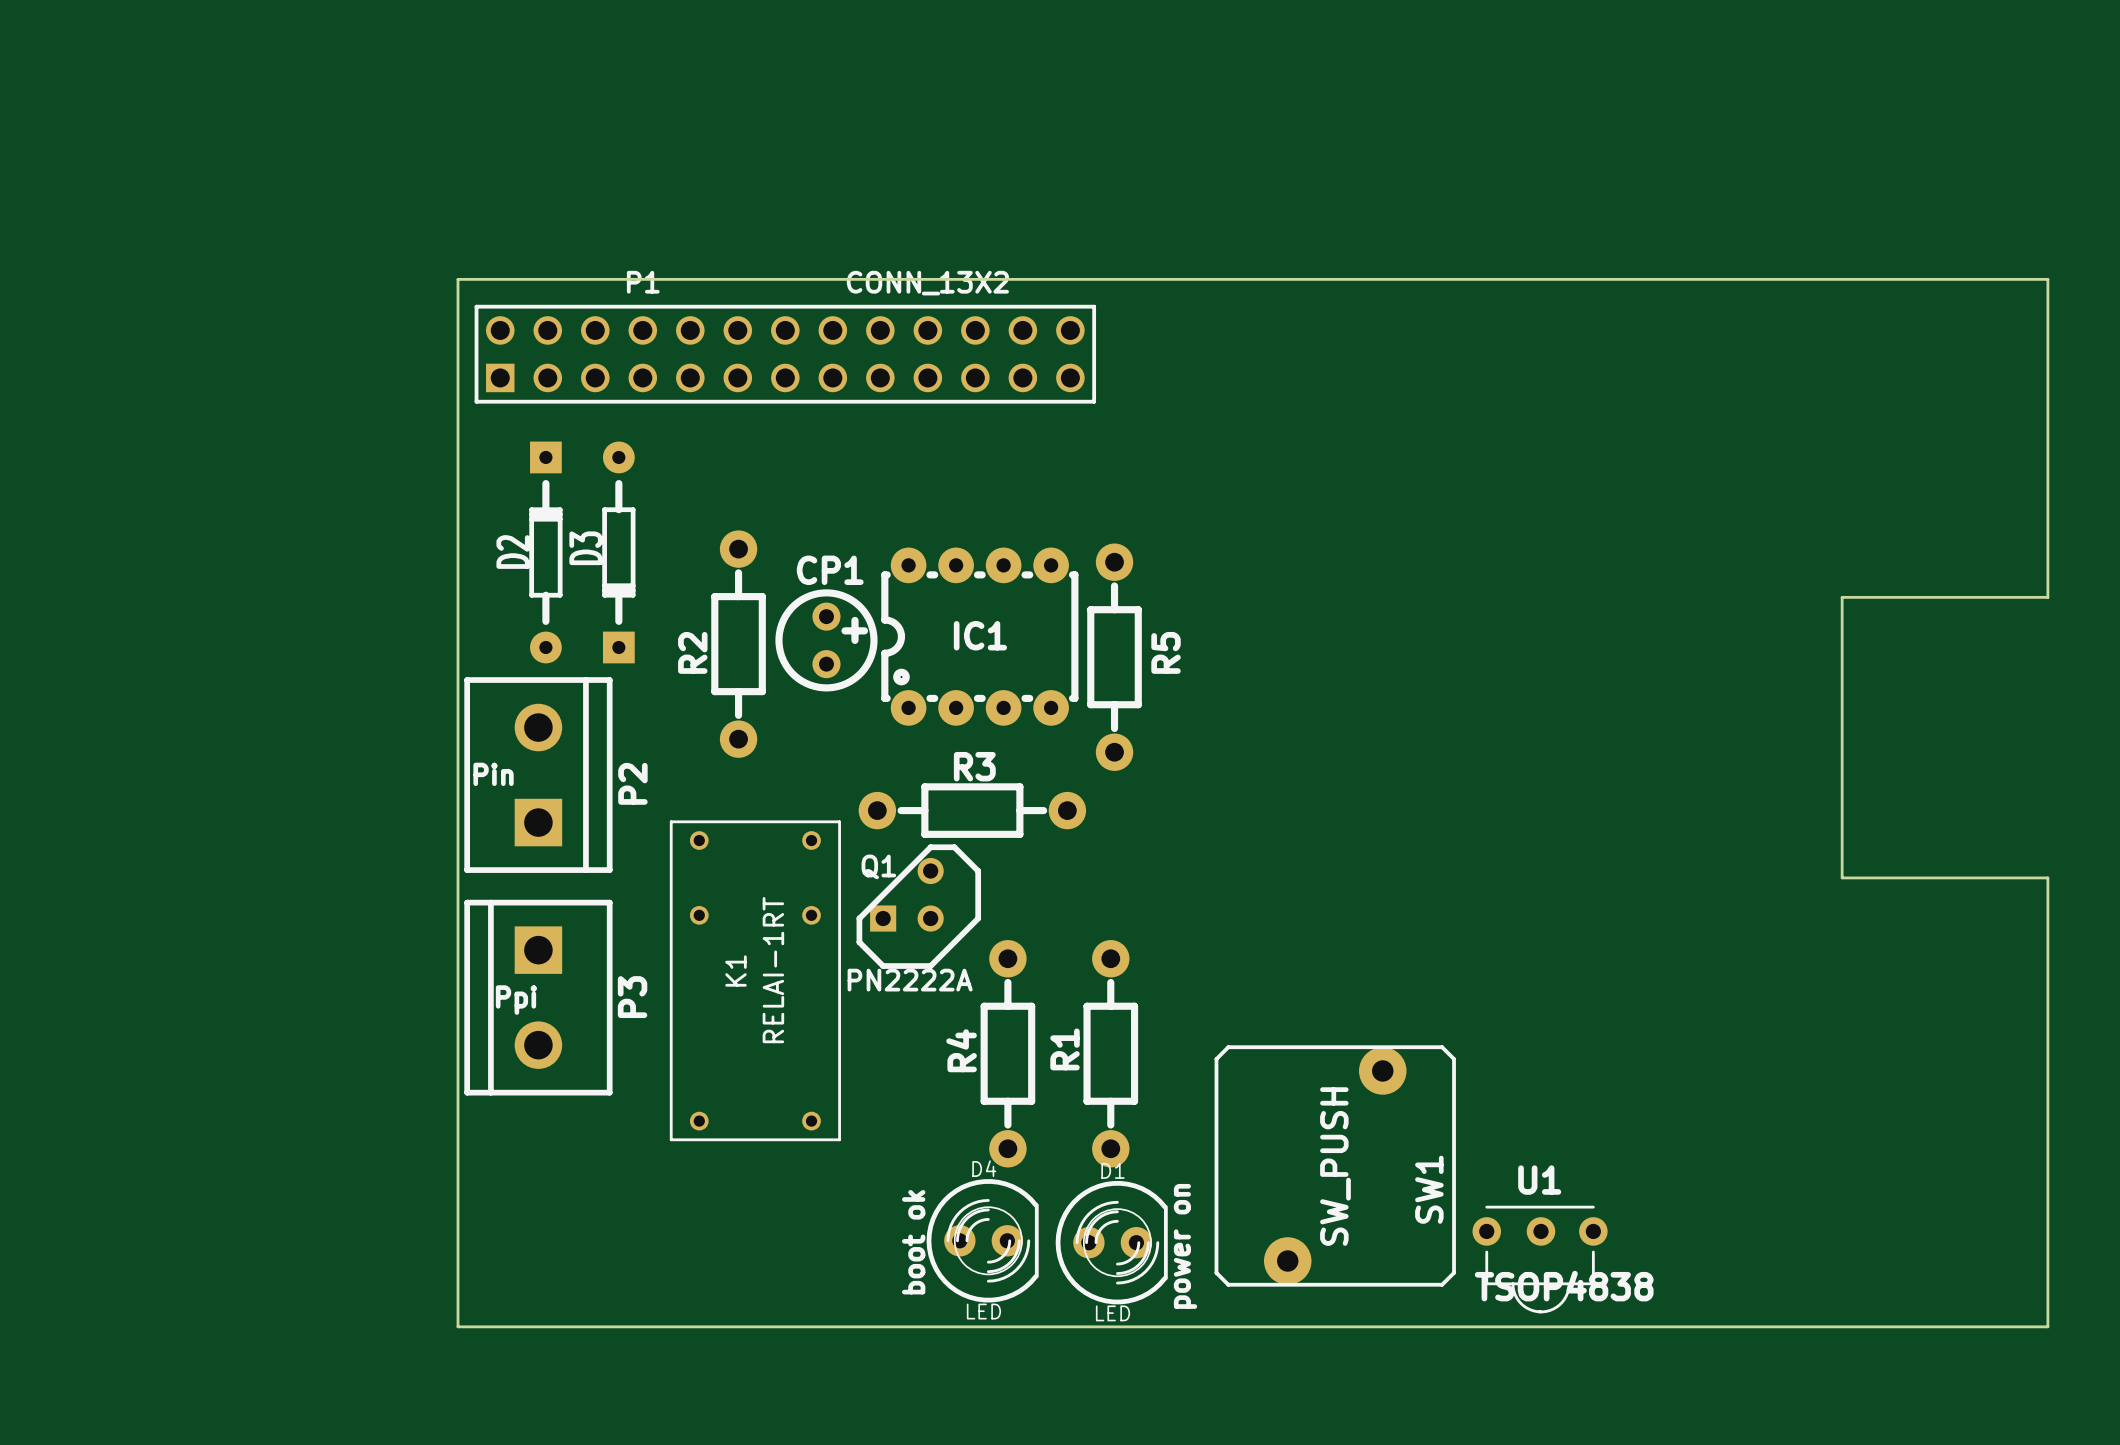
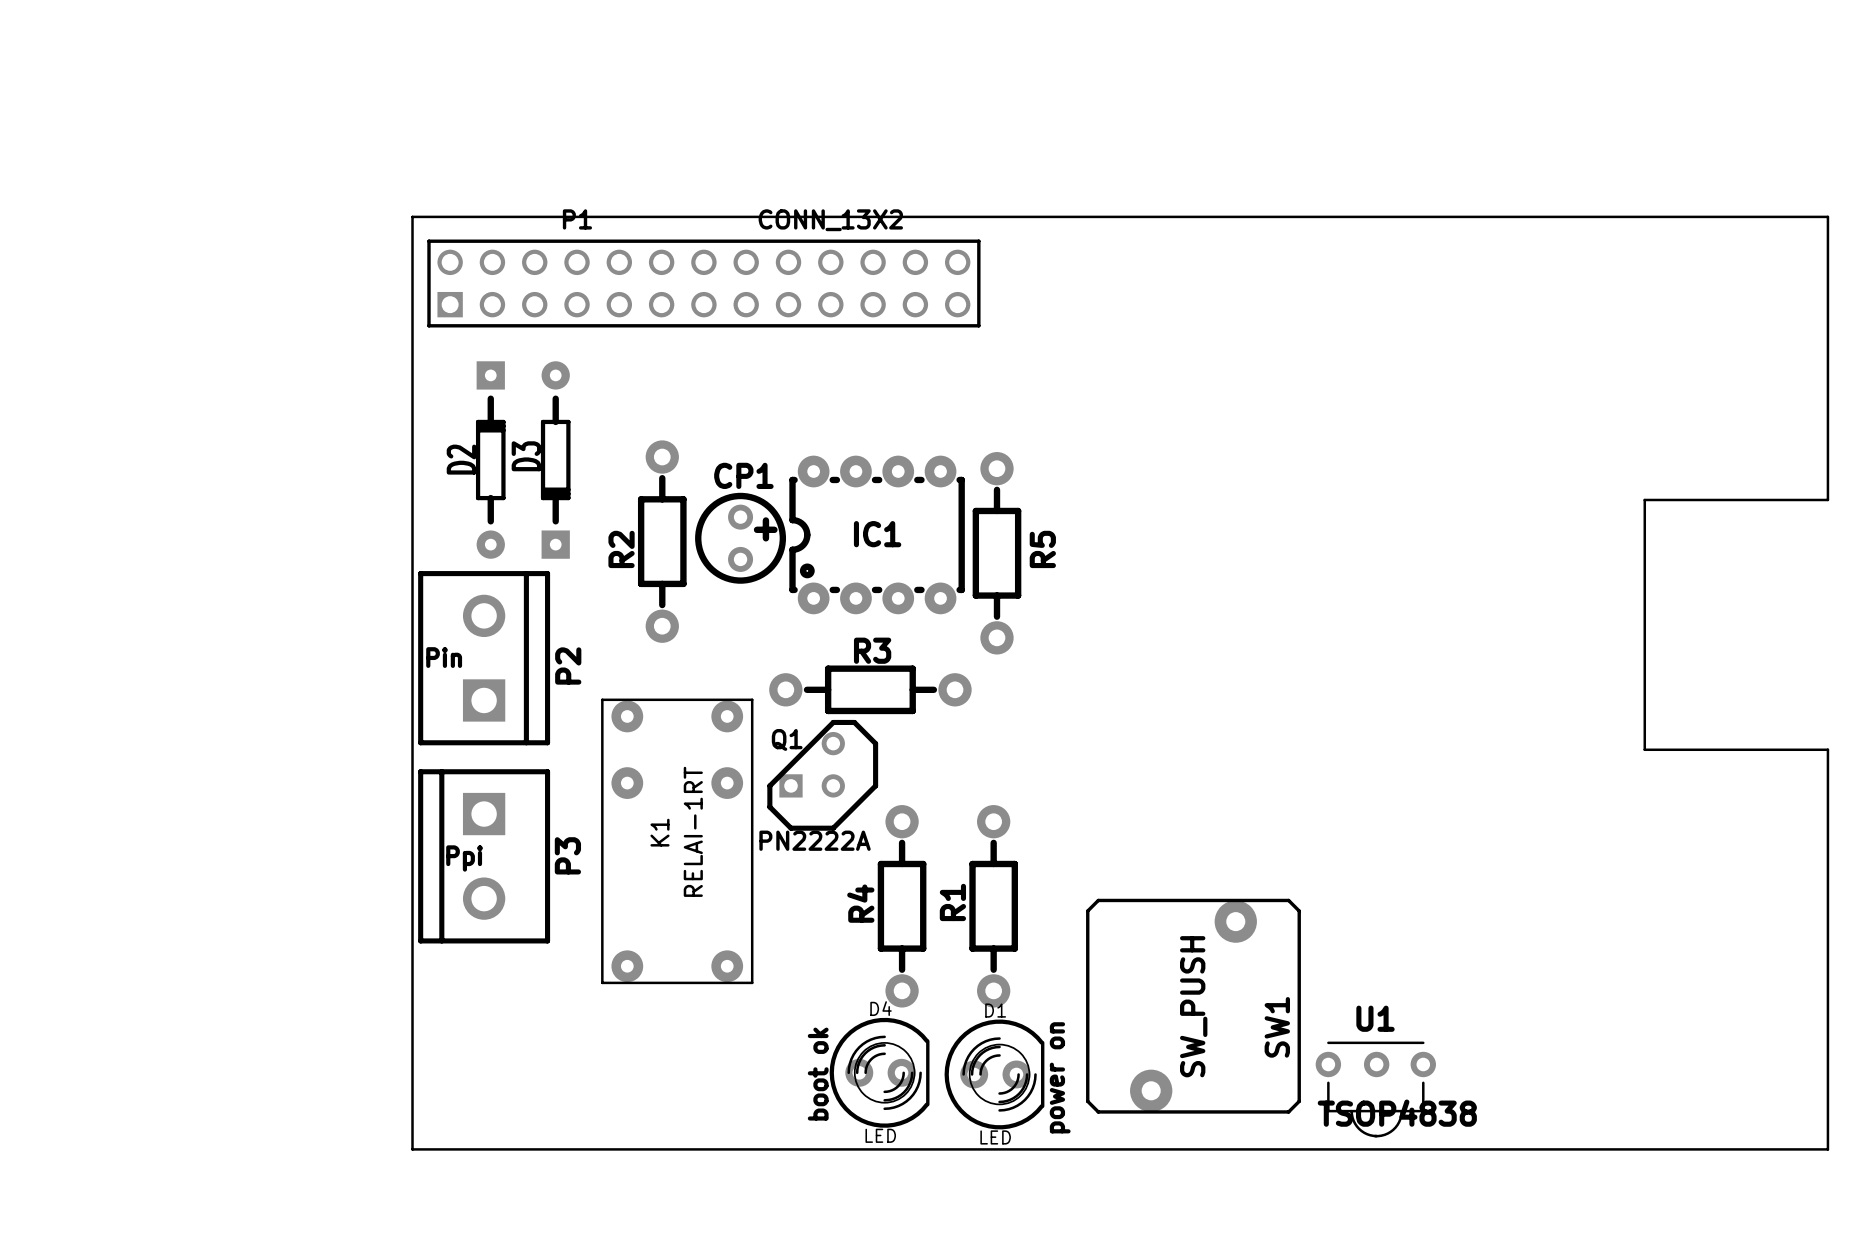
K1 footprint: [669, 820, 841, 1142] -> [601, 698, 754, 985]

